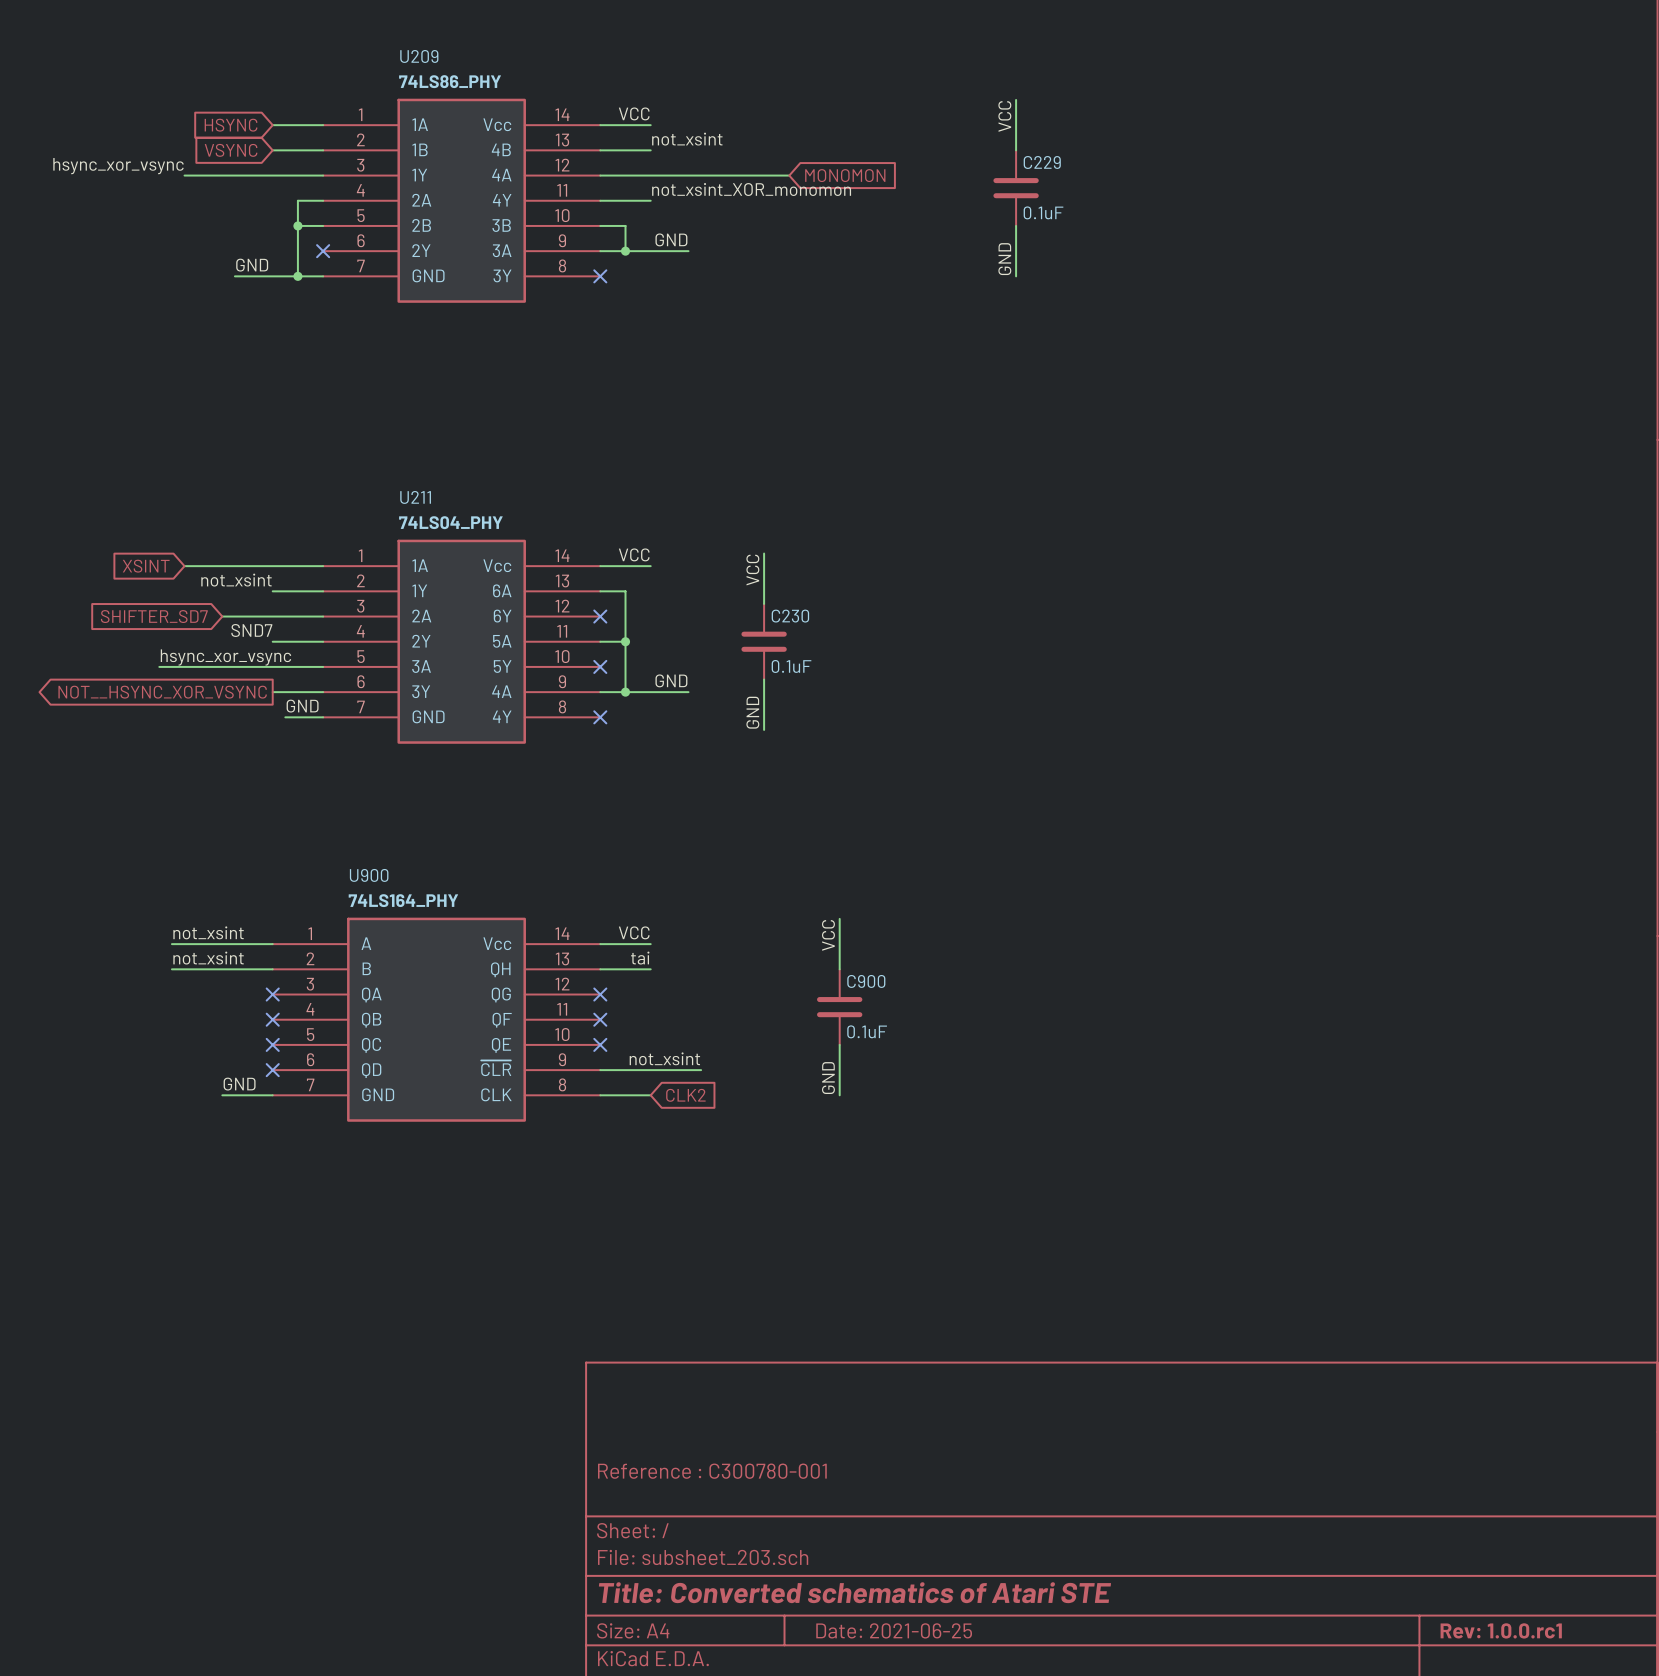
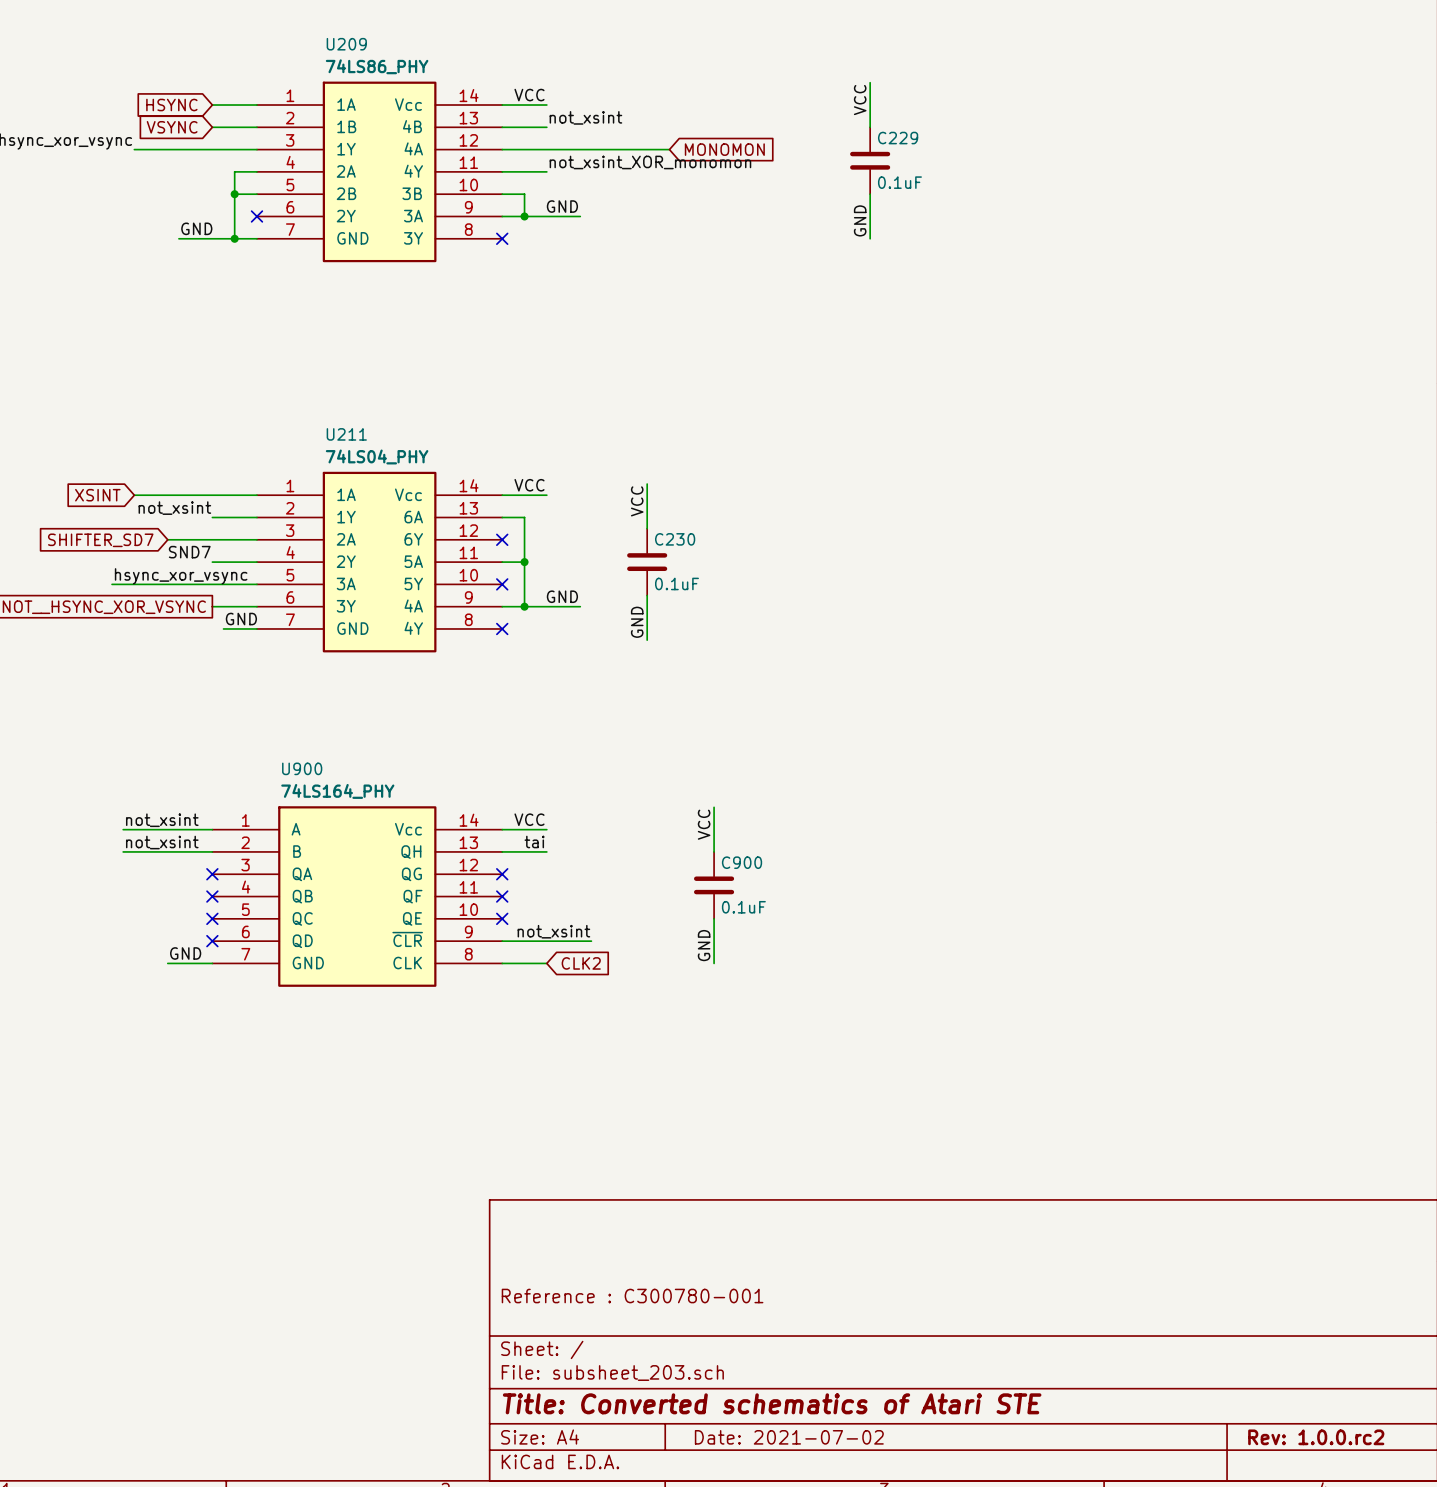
title block: Date: 2021-06-25 (894, 1630) -> Date: 2021-07-02 (789, 1437)
title block: Rev: 1.0.0.rc1 (1501, 1630) -> Rev: 1.0.0.rc2 (1316, 1437)

